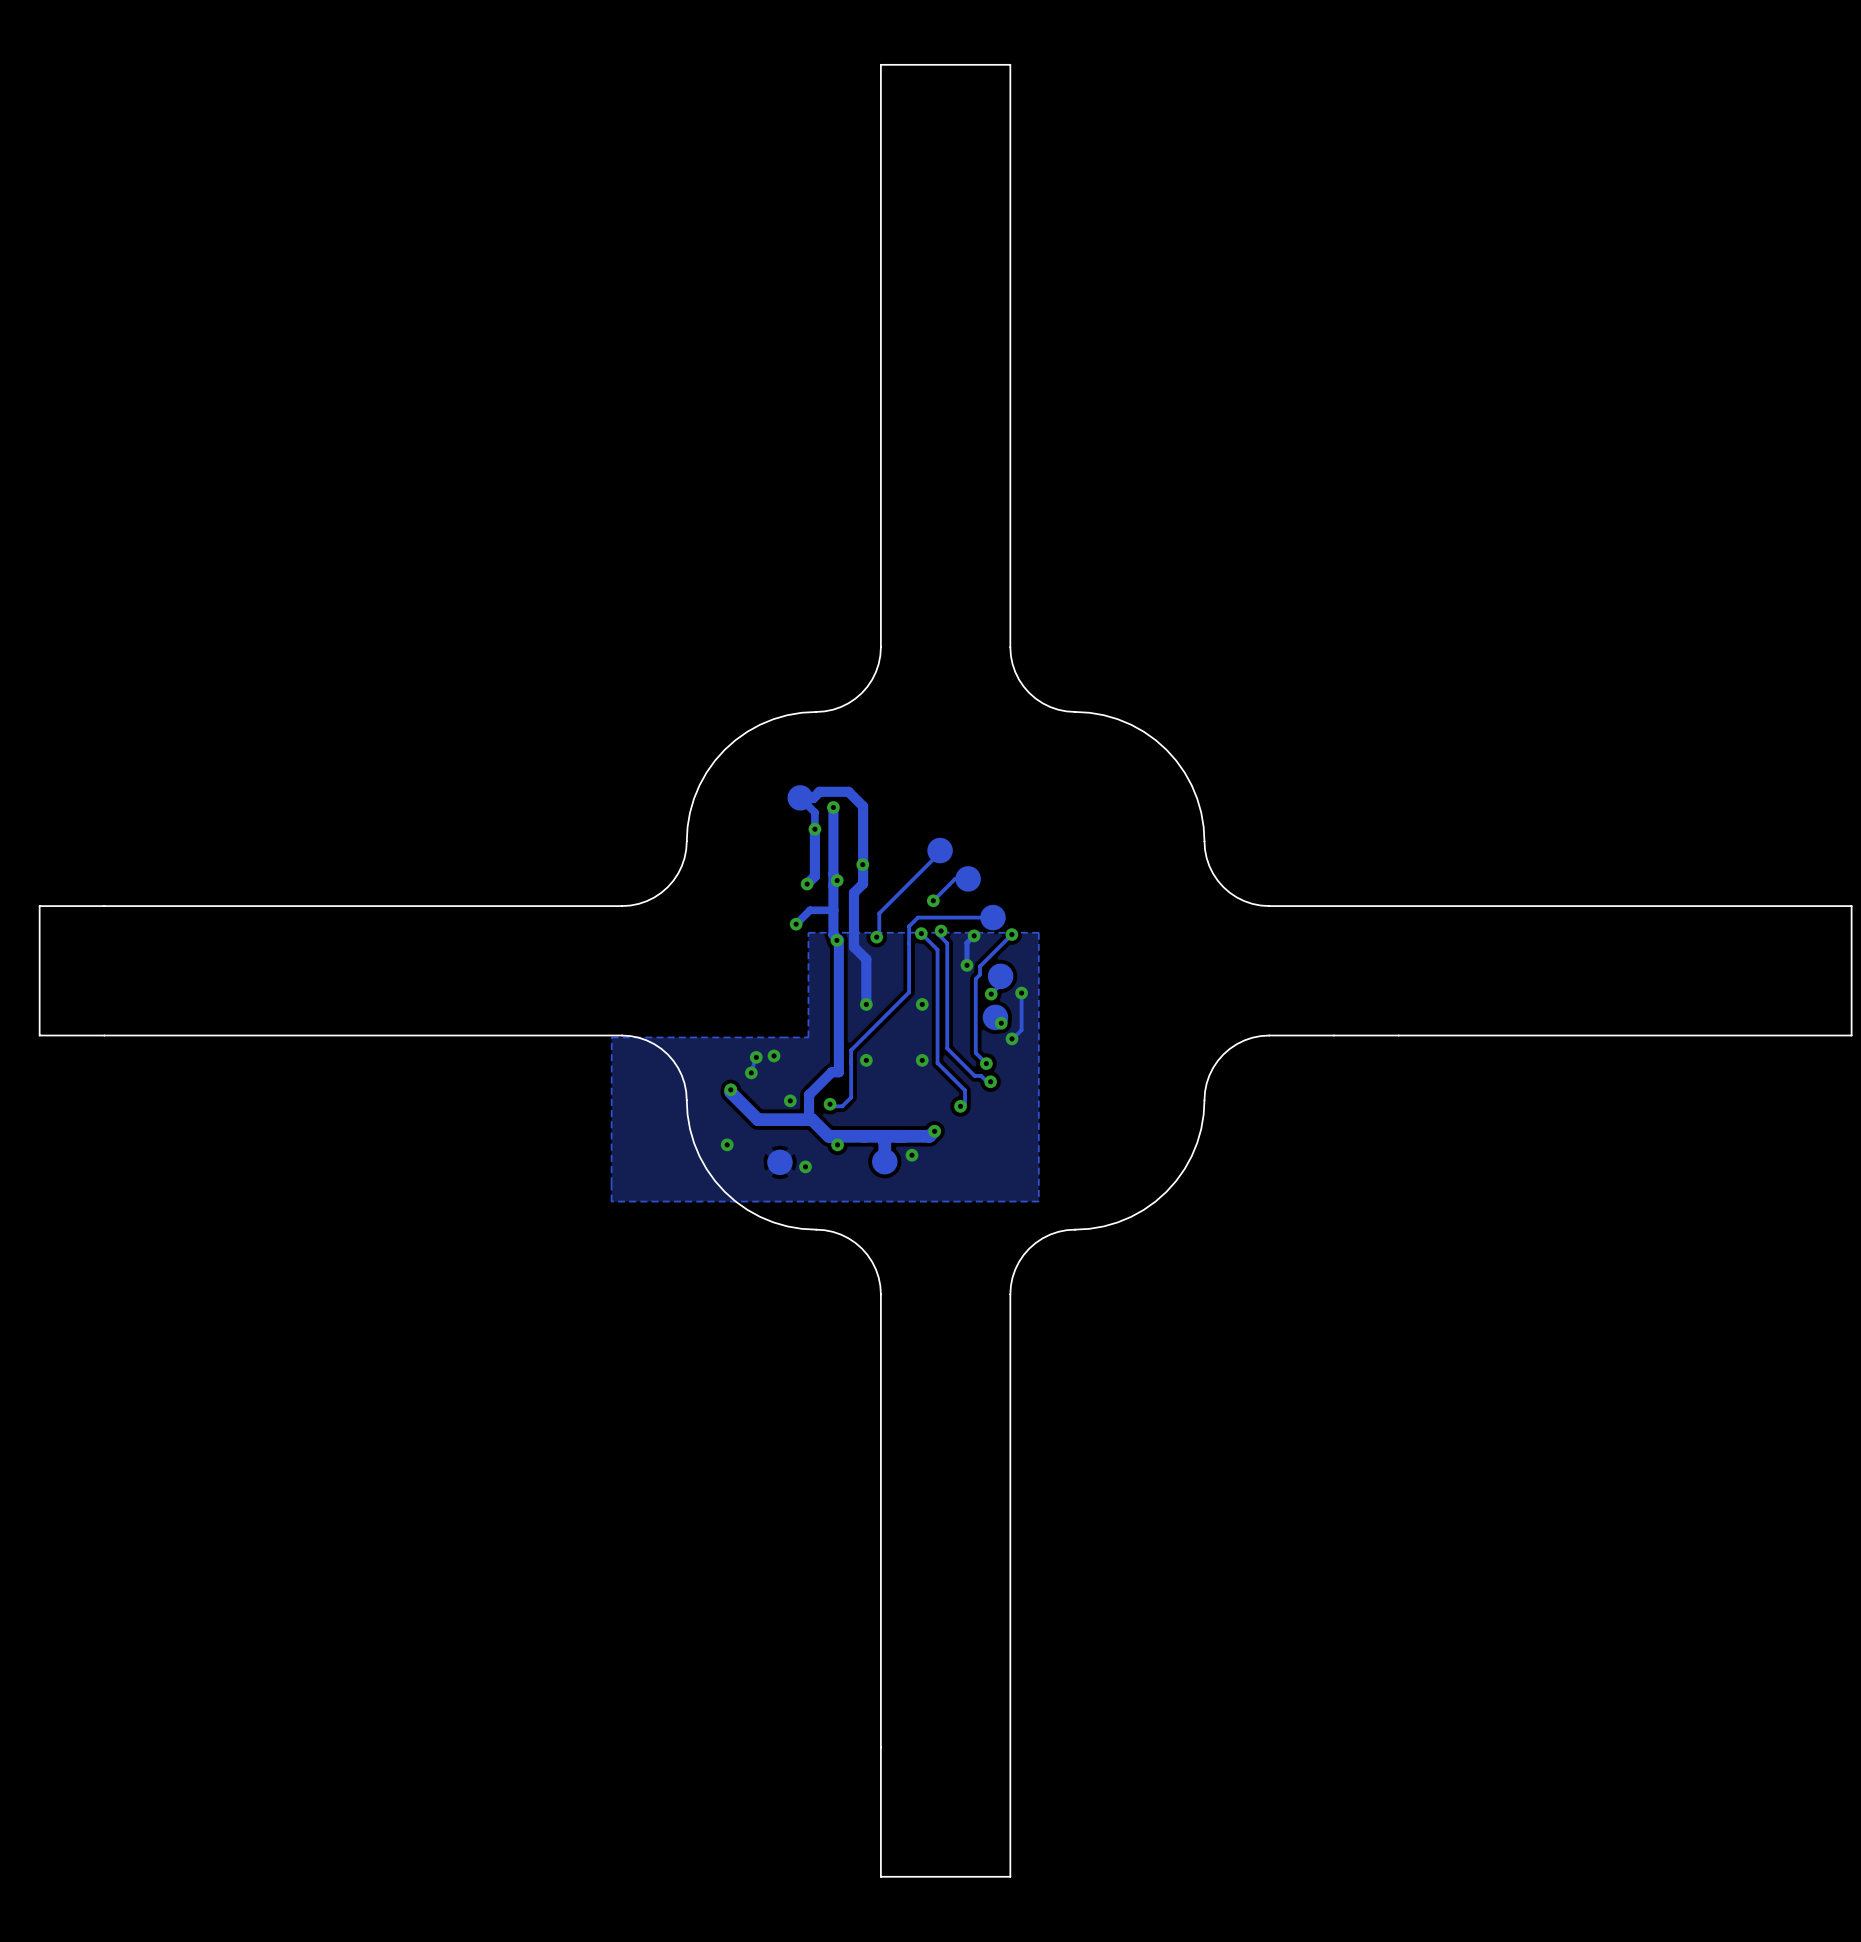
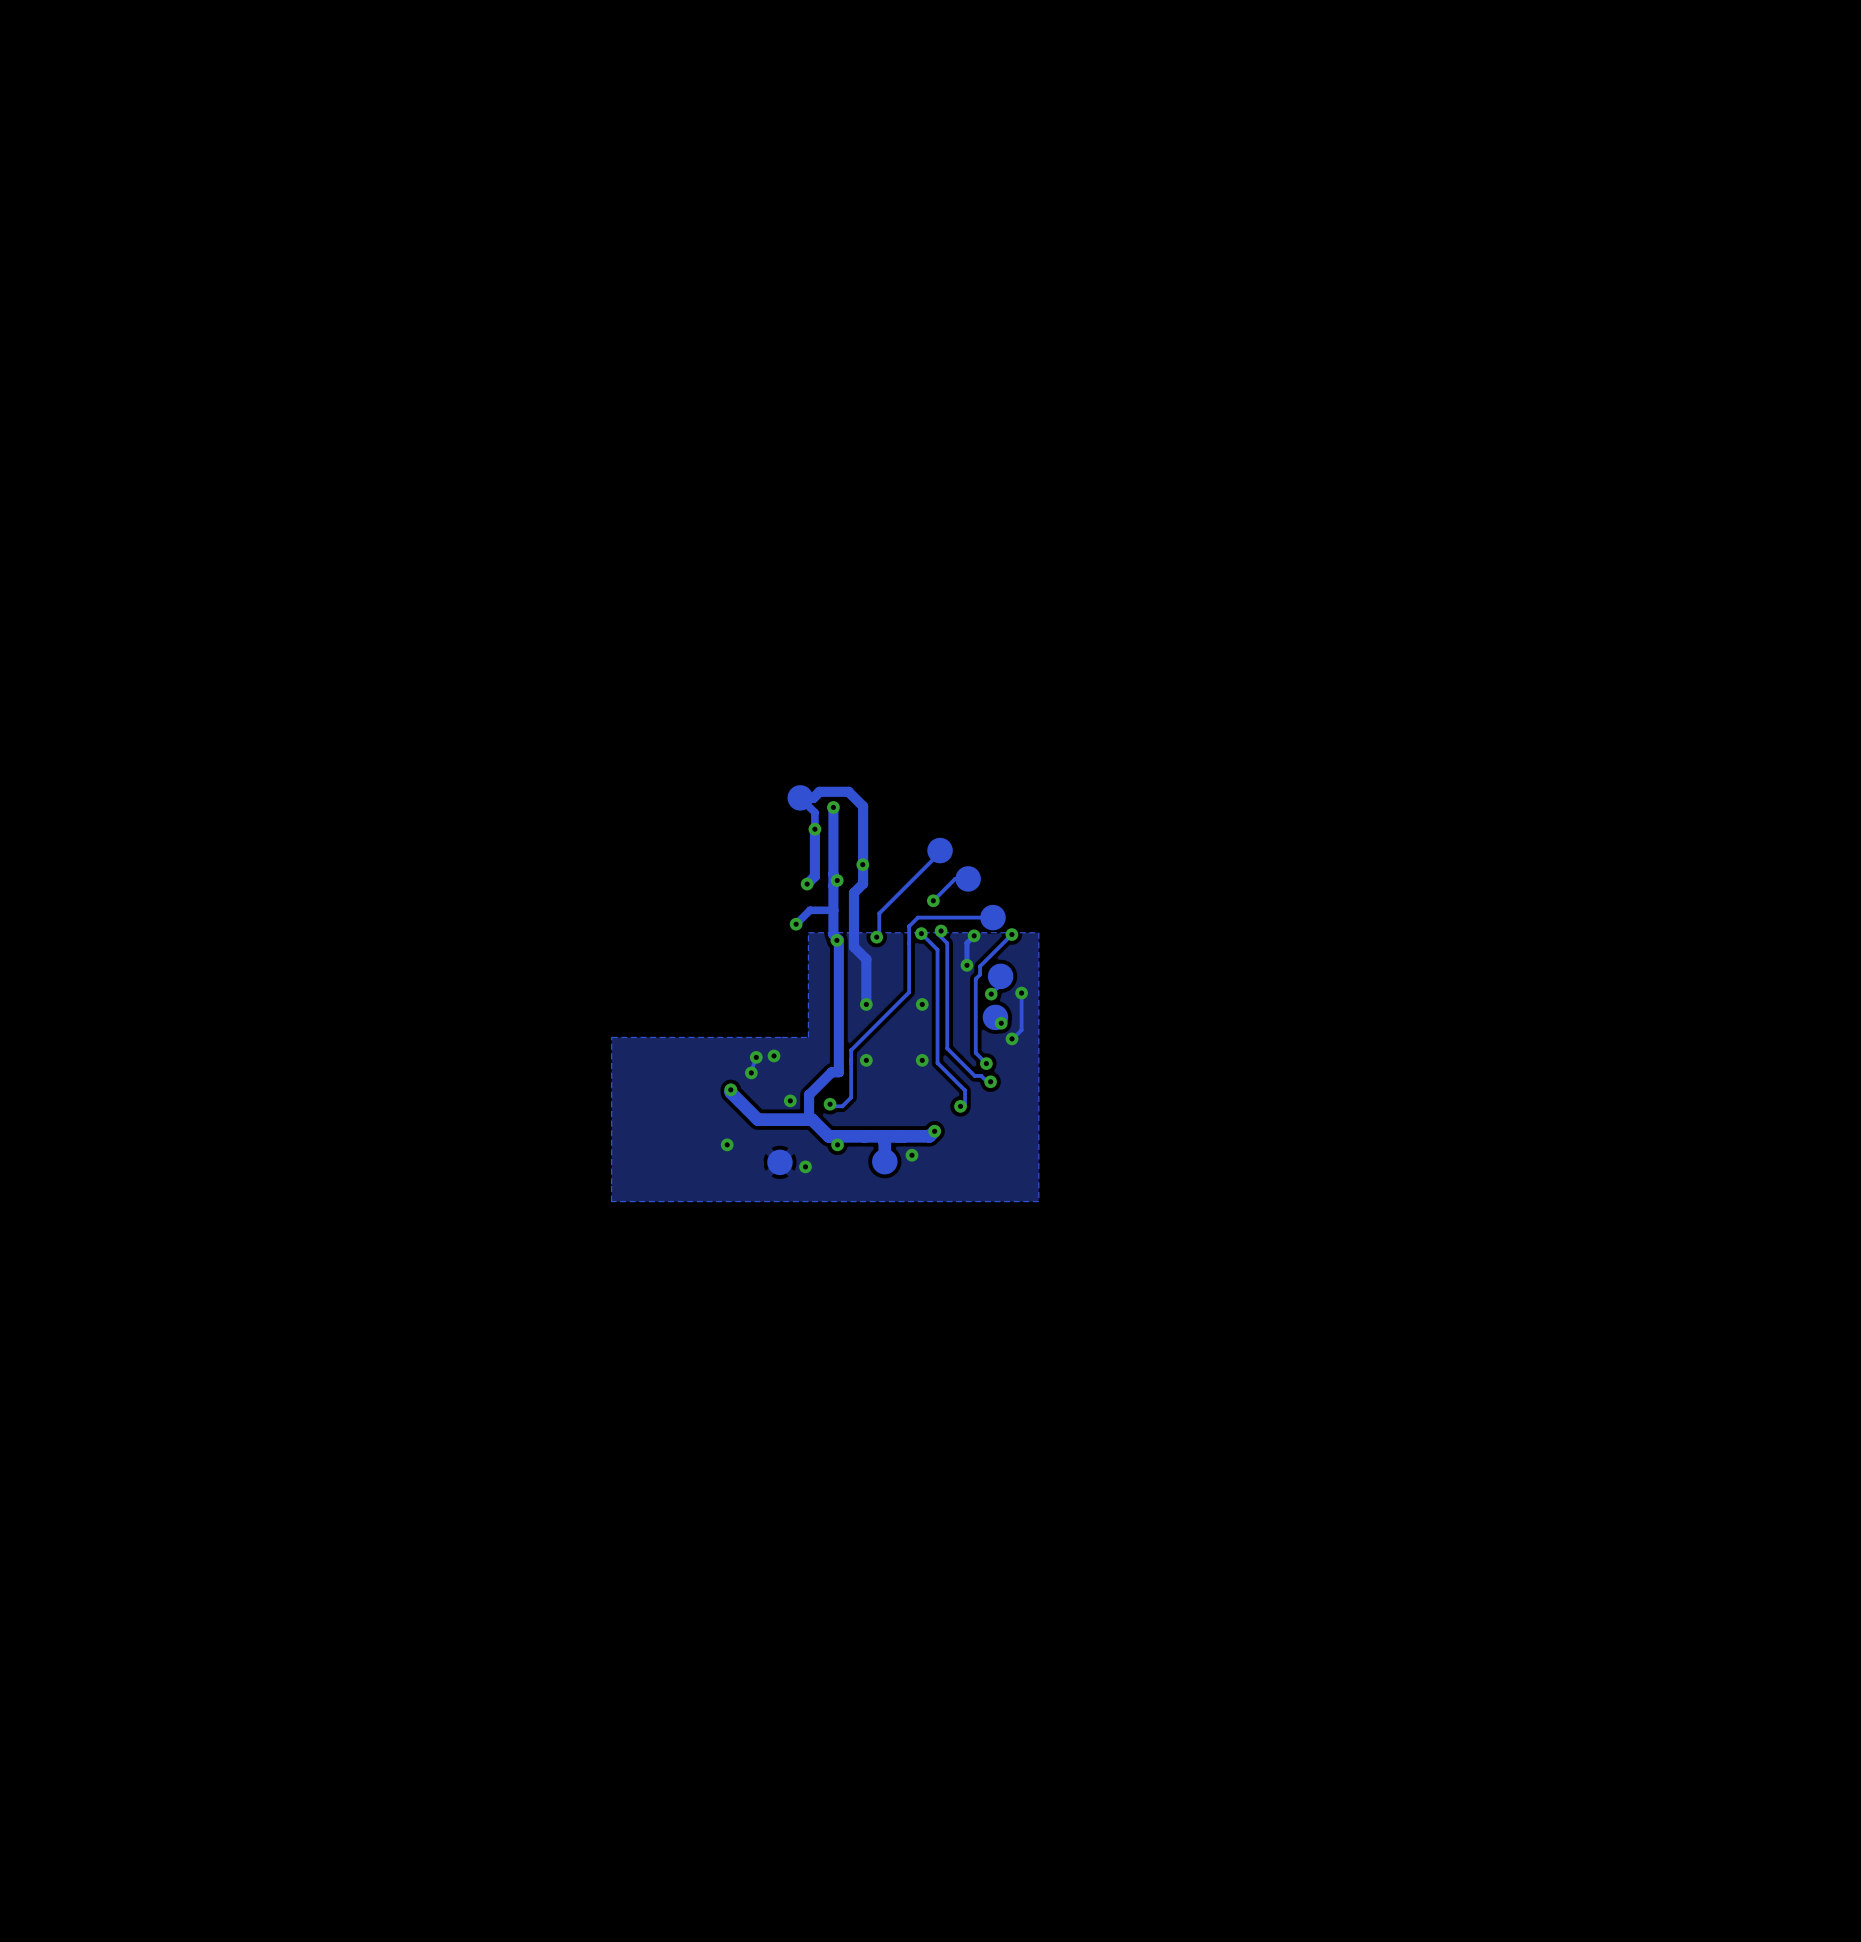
board edge: (1010, 64) (1010, 647) (1012, 663) (1023, 686) (1035, 698) (1050, 707) (1066, 711) (1103, 715) (1131, 724) (1143, 731) (1166, 749) (1184, 772) (1197, 798) (1203, 826) (1206, 858) (1213, 873) (1229, 892) (1252, 903) (1269, 906) (1851, 906) (1851, 1035) (1269, 1035) (1252, 1037) (1229, 1048) (1217, 1060) (1209, 1075) (1205, 1091) (1201, 1129) (1191, 1156) (1184, 1169) (1166, 1191) (1143, 1209) (1117, 1222) (1089, 1228) (1058, 1231) (1042, 1238) (1023, 1254) (1012, 1277) (1010, 1294) (1010, 1876) (880, 1876) (880, 1294) (878, 1277) (867, 1254) (855, 1243) (840, 1234) (824, 1230) (787, 1226) (760, 1216) (747, 1209) (724, 1191) (706, 1169) (694, 1142) (687, 1114) (684, 1083) (678, 1067) (661, 1048) (638, 1037) (622, 1035) (39, 1035) (39, 906) (622, 906) (638, 903) (661, 892) (673, 880) (681, 866) (686, 849) (690, 812) (699, 785) (706, 772) (724, 749) (747, 731) (773, 719) (801, 712) (832, 709) (848, 703) (867, 686) (878, 663) (880, 647) (880, 64) (1010, 64) -> none

